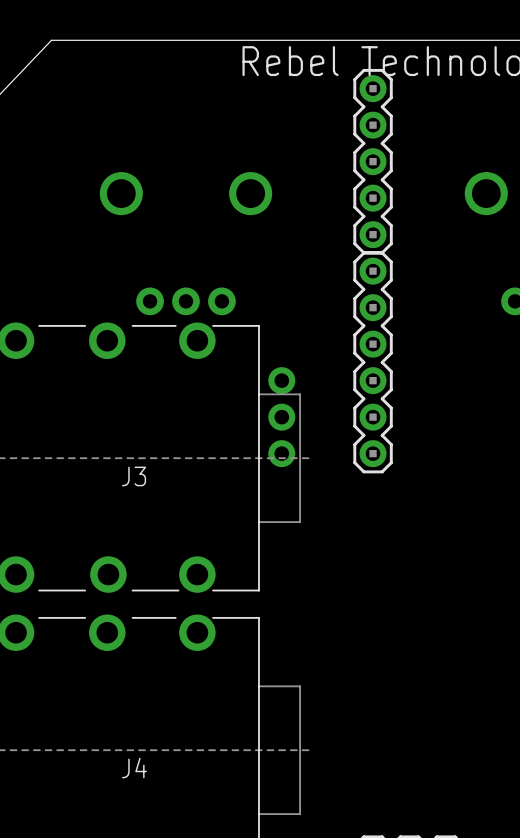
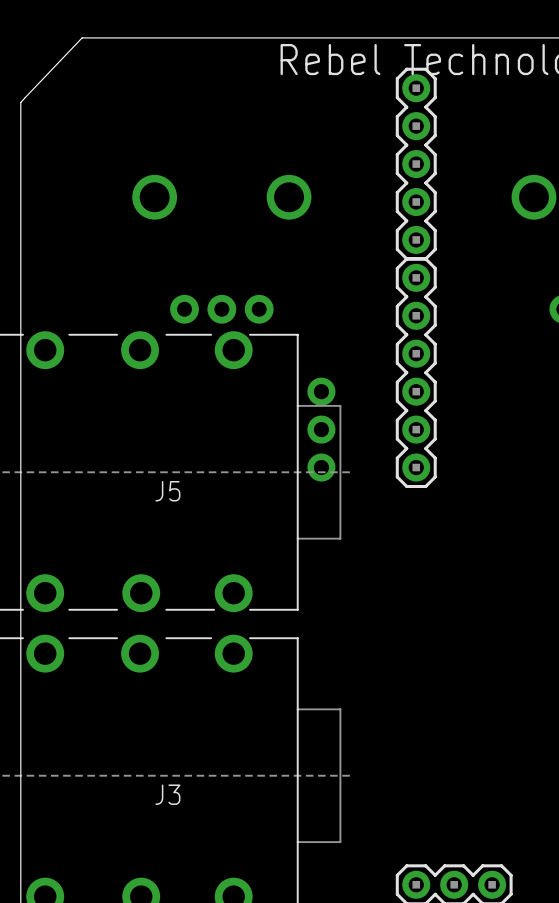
J3 name: J3 (134, 476) -> J5 (167, 491)
J4 name: J4 (134, 768) -> J3 (167, 794)

